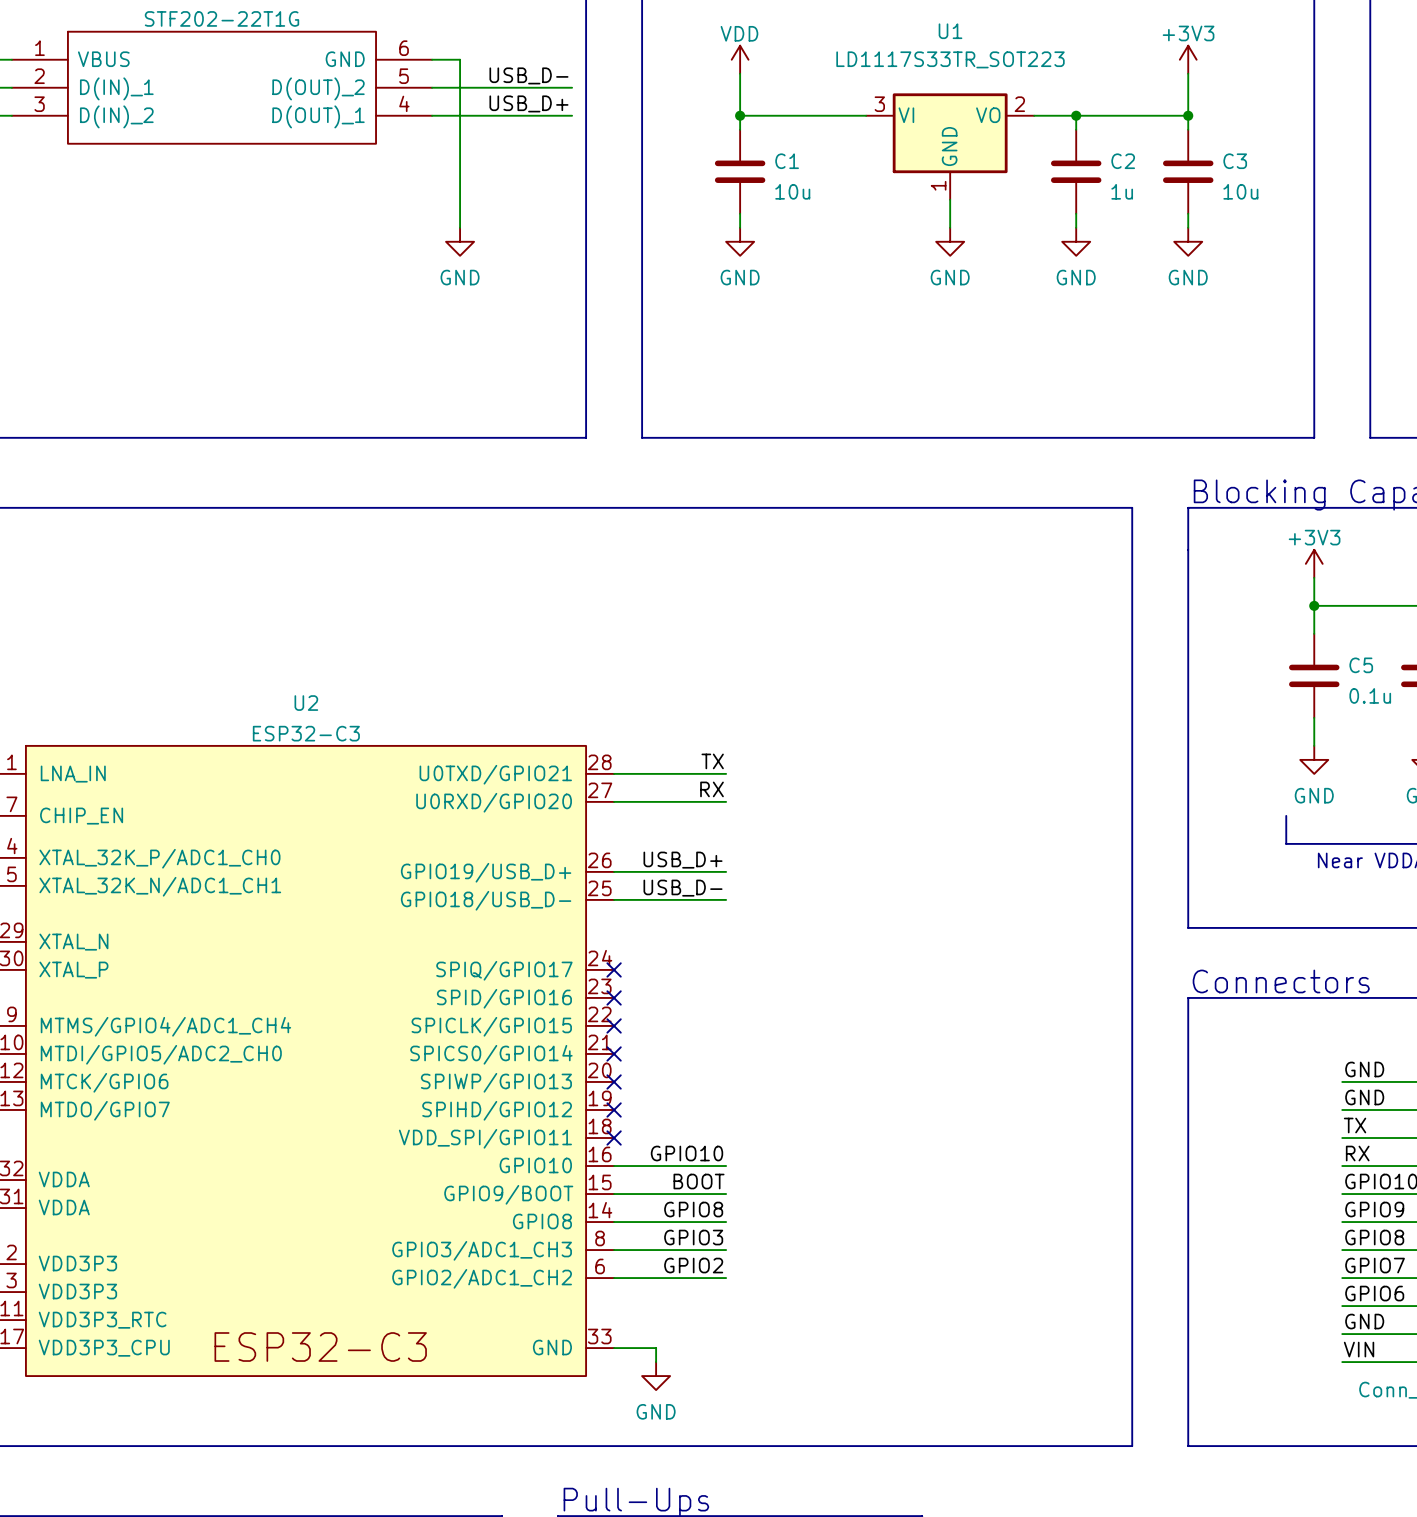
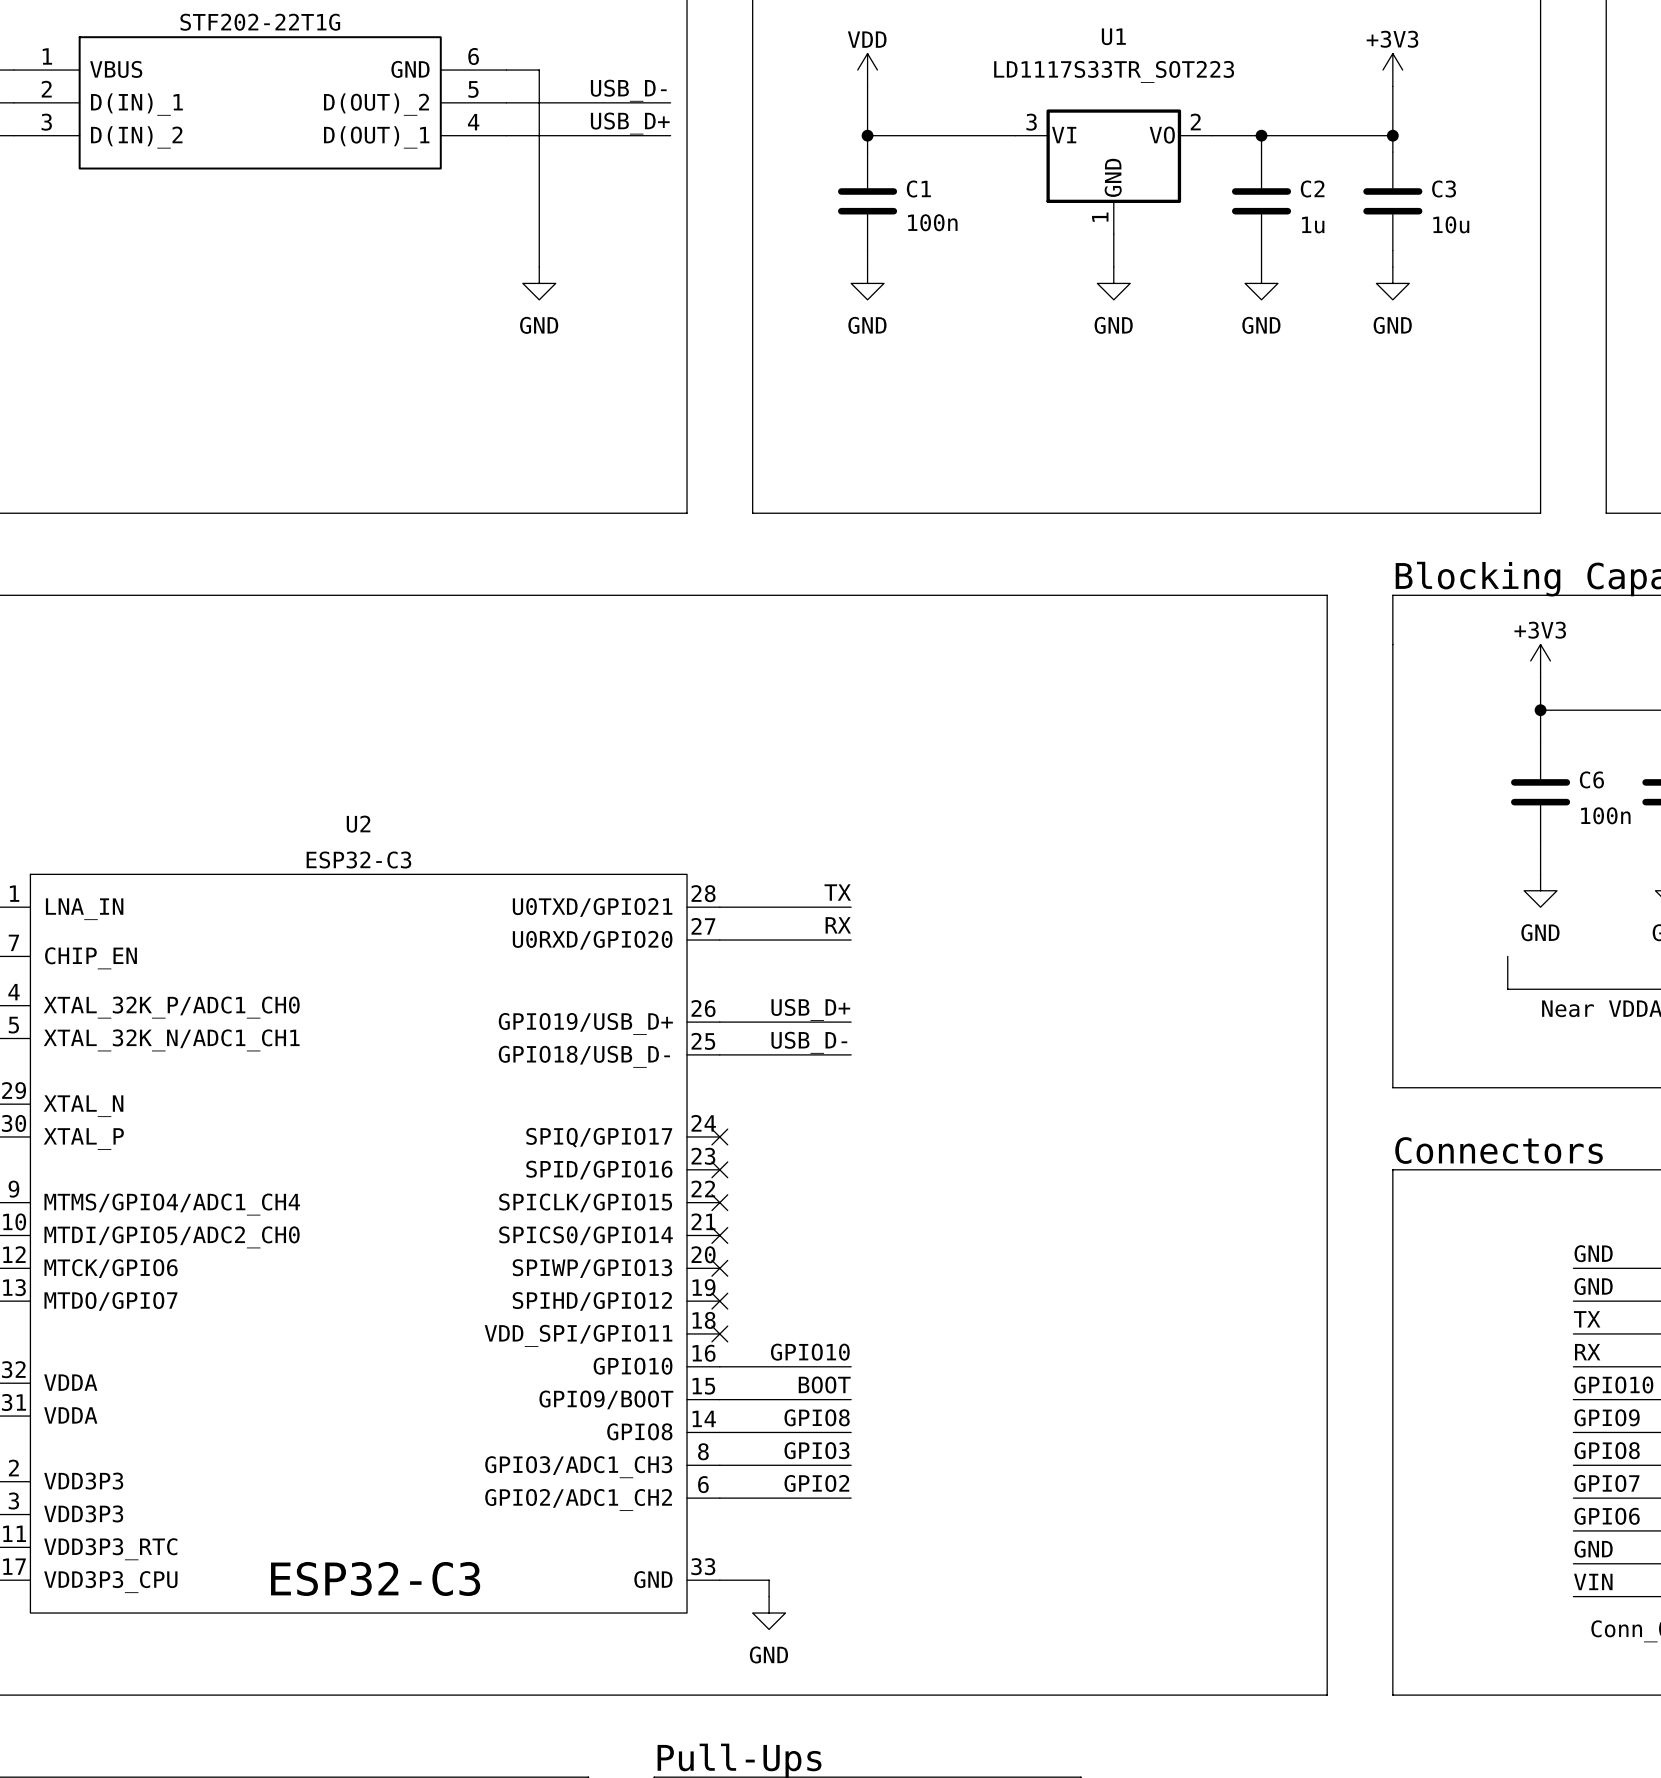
C1 value: 10u (792, 191) -> 100n (932, 222)
C5 name: C5 (1361, 665) -> C6 (1591, 779)
C5 value: 0.1u (1370, 695) -> 100n (1605, 815)

